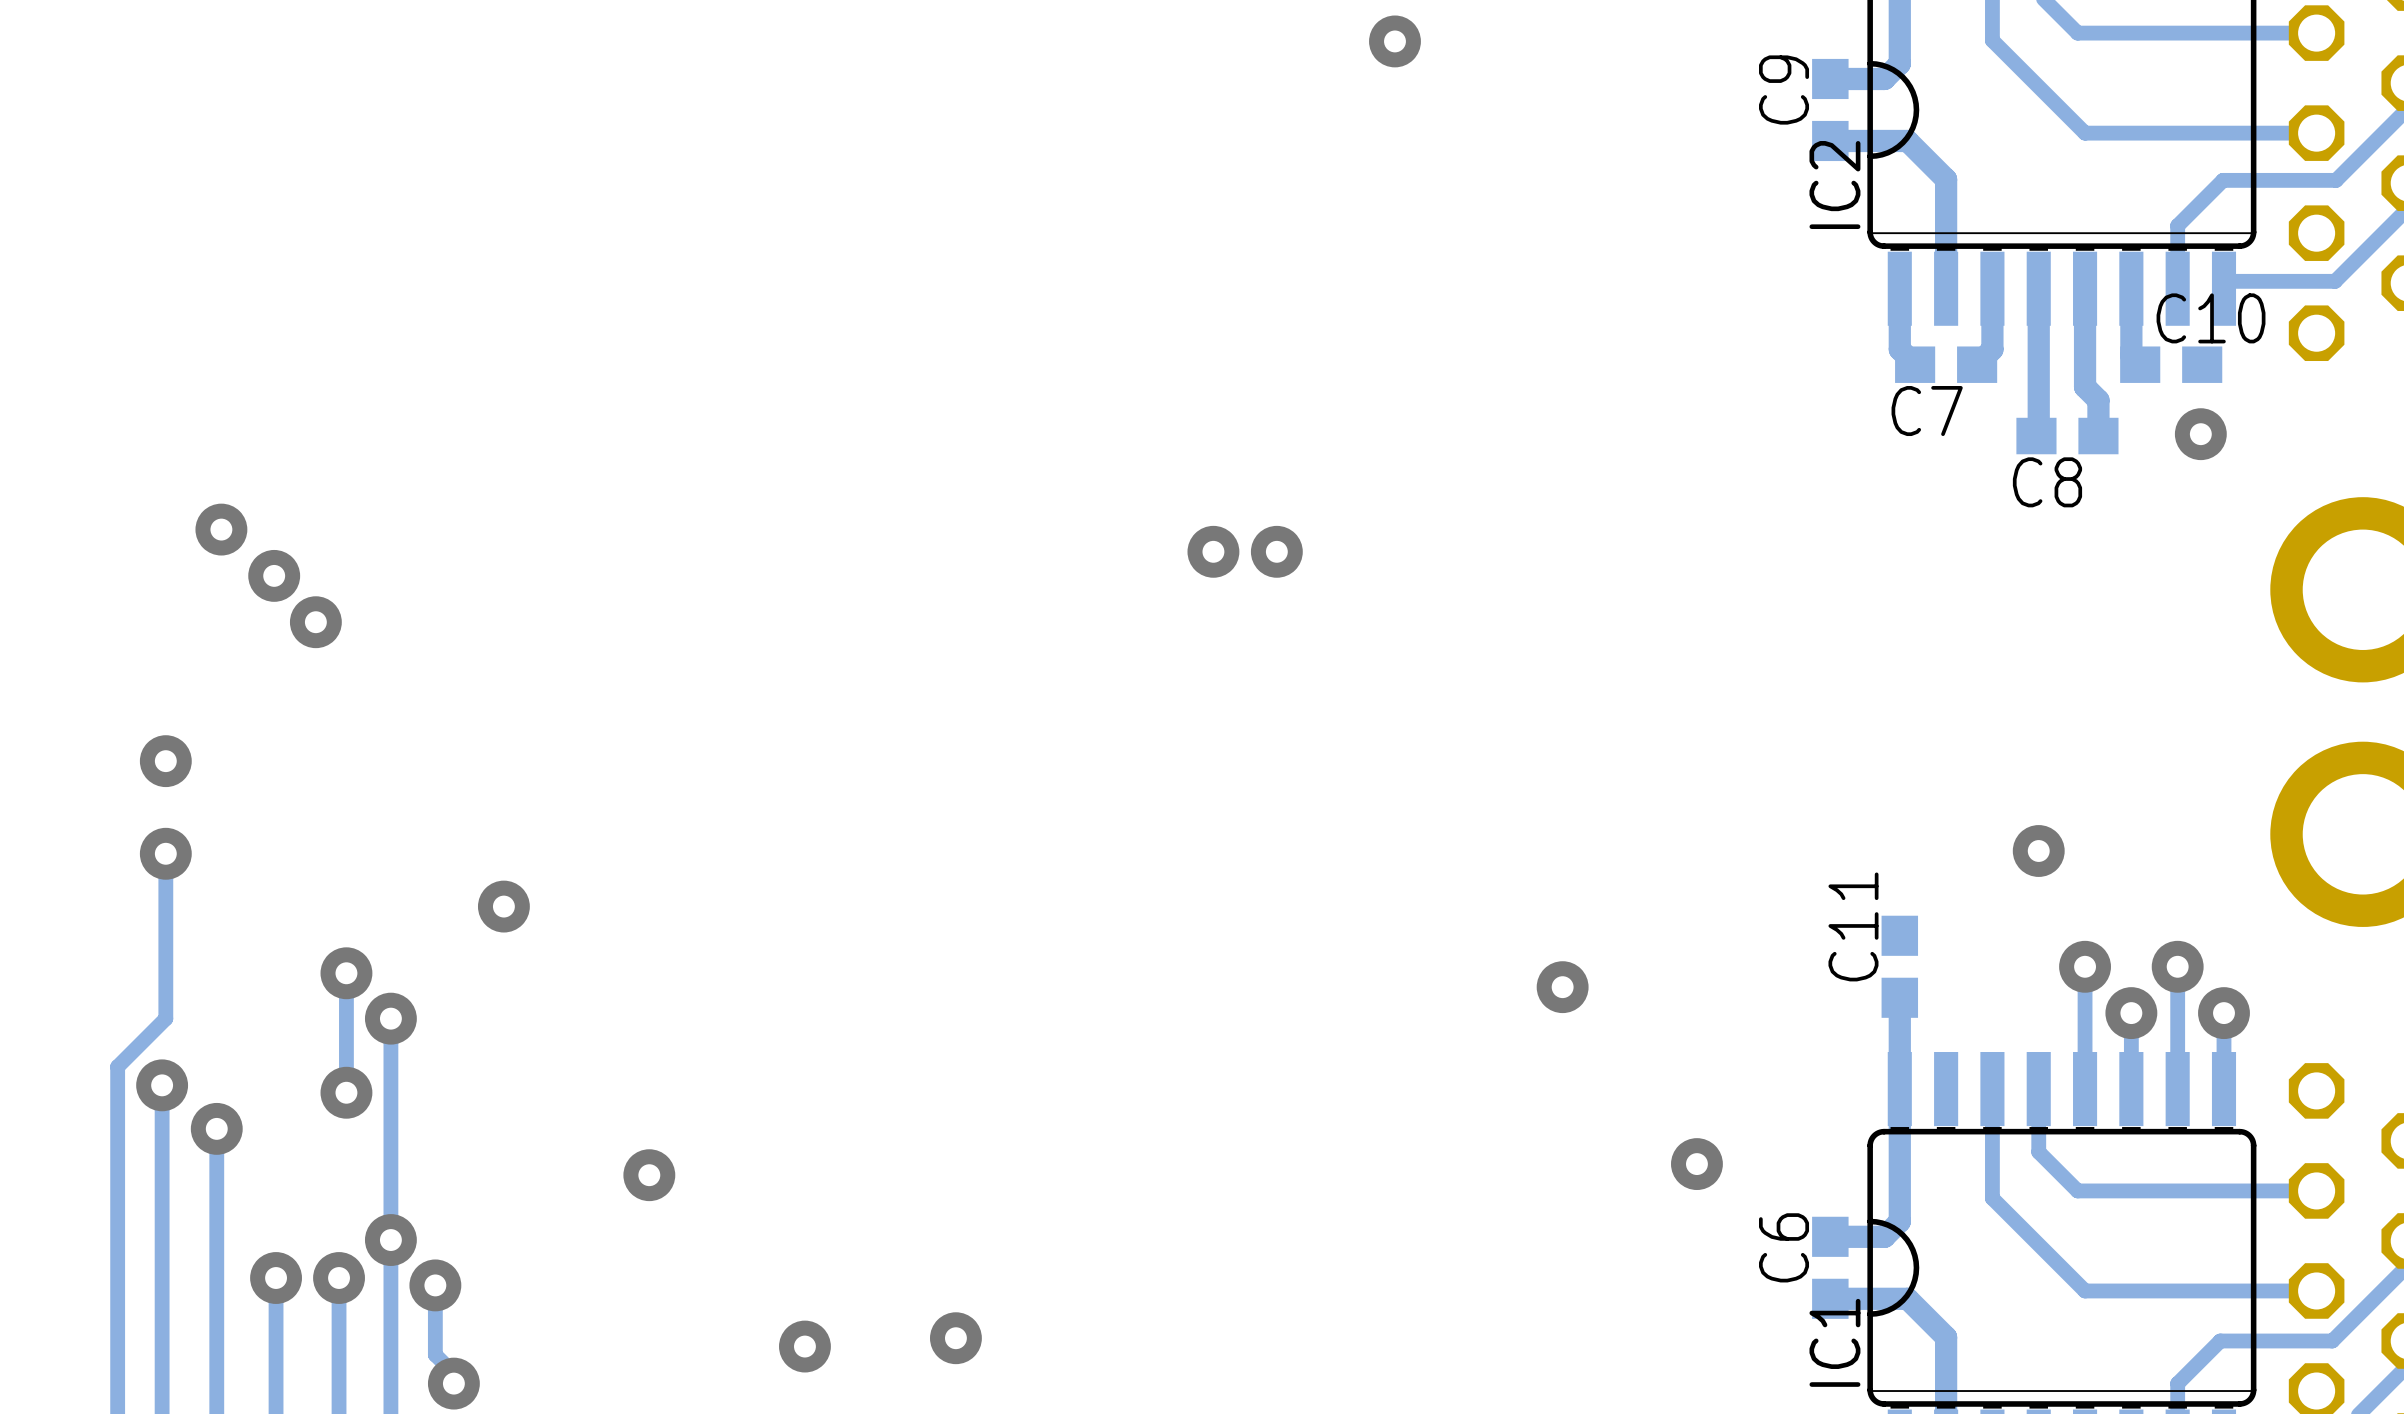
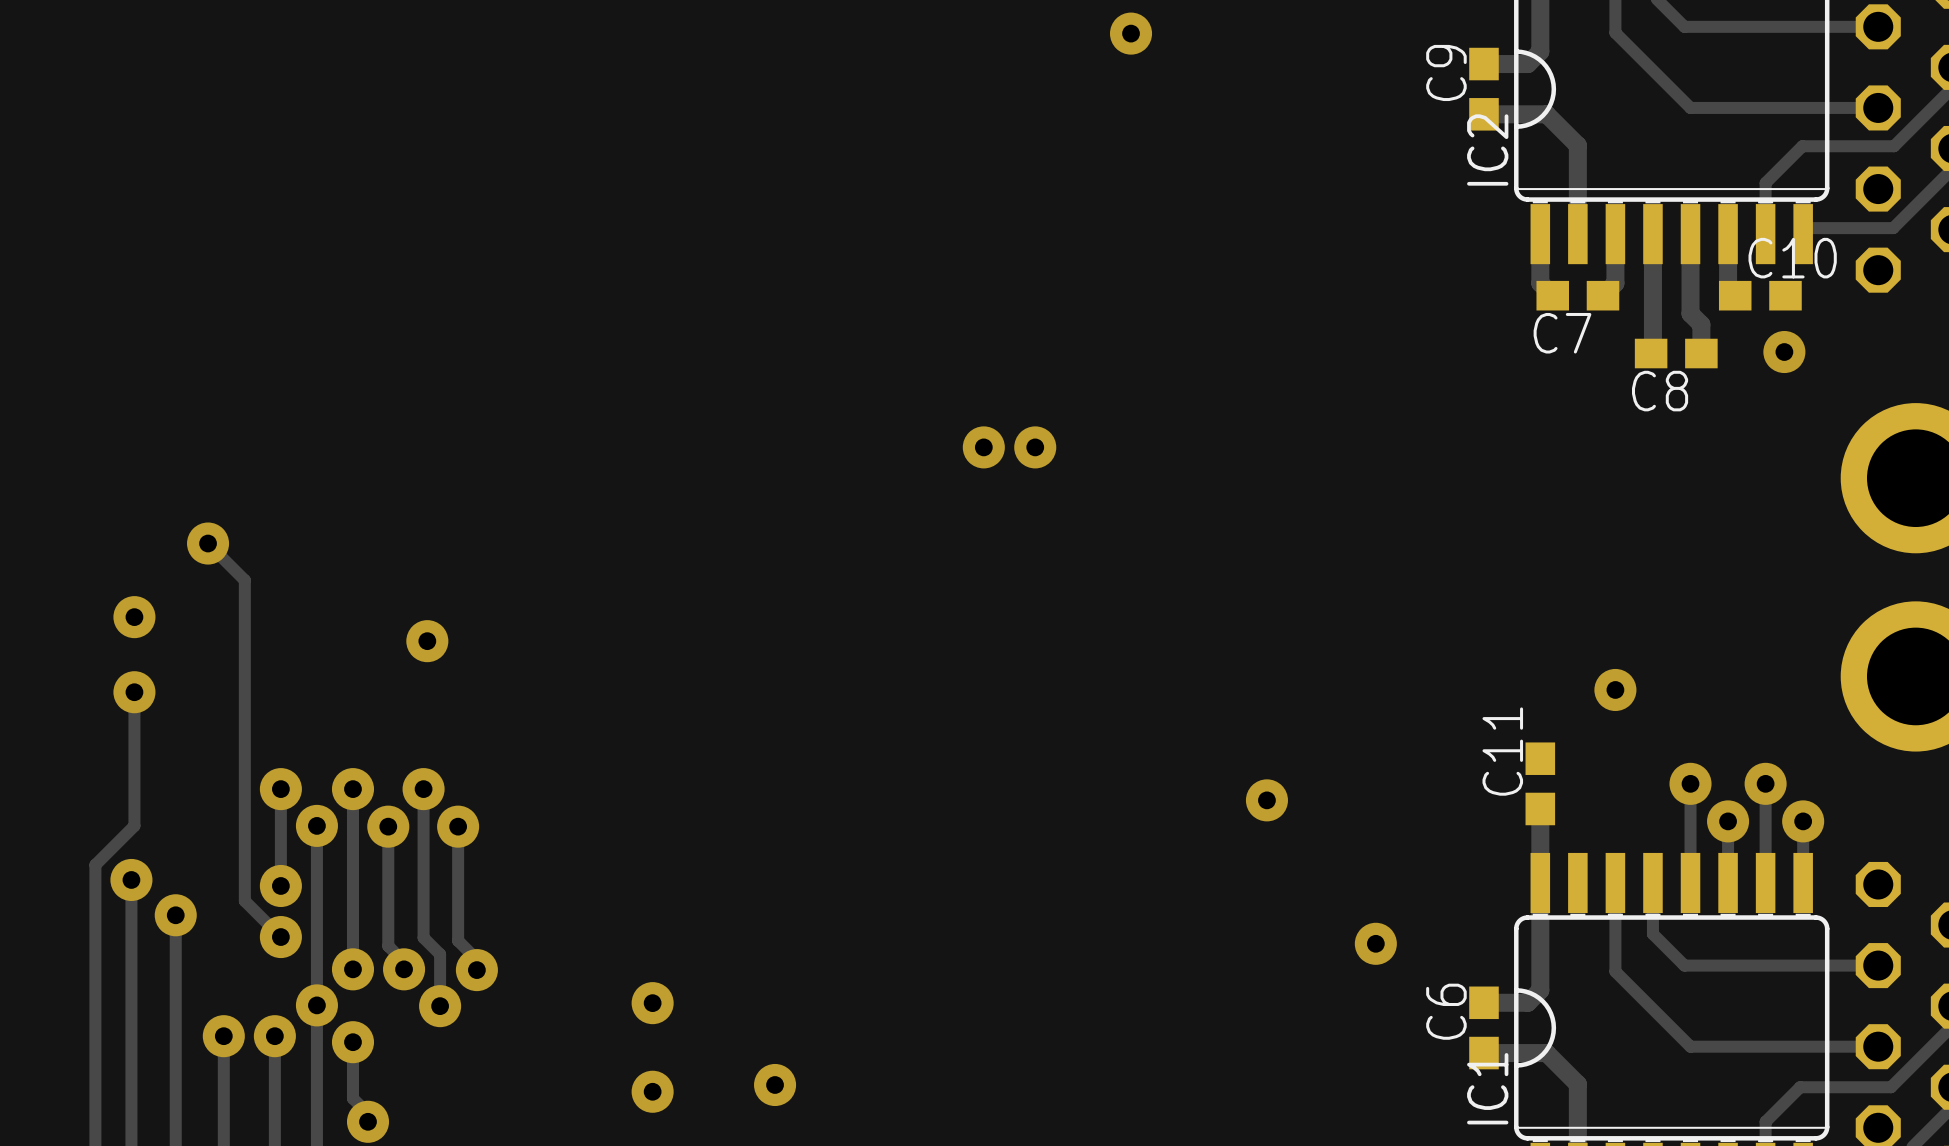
via: (221, 529) -> none
via: (274, 575) -> none
via: (315, 622) -> none
track: none -> (208, 543) (244, 580) (244, 901) (280, 937)
via: none -> (208, 543)
via: none -> (427, 641)
via position: (2038, 851) -> (1615, 689)
via: (503, 906) -> none
track: none -> (352, 789) (352, 969)
via: none -> (352, 789)
track: none -> (423, 789) (423, 937) (440, 954) (440, 1006)
via: none -> (423, 789)
track: none -> (388, 826) (388, 946) (404, 961) (404, 969)
via: none -> (388, 826)
track: none -> (458, 826) (458, 940) (476, 959) (476, 970)
via: none -> (458, 826)
via: none -> (280, 937)
via: (649, 1175) -> none
via: none -> (352, 969)
via: none -> (404, 969)
via: none -> (476, 970)
via: none -> (652, 1003)
via: none -> (440, 1006)

